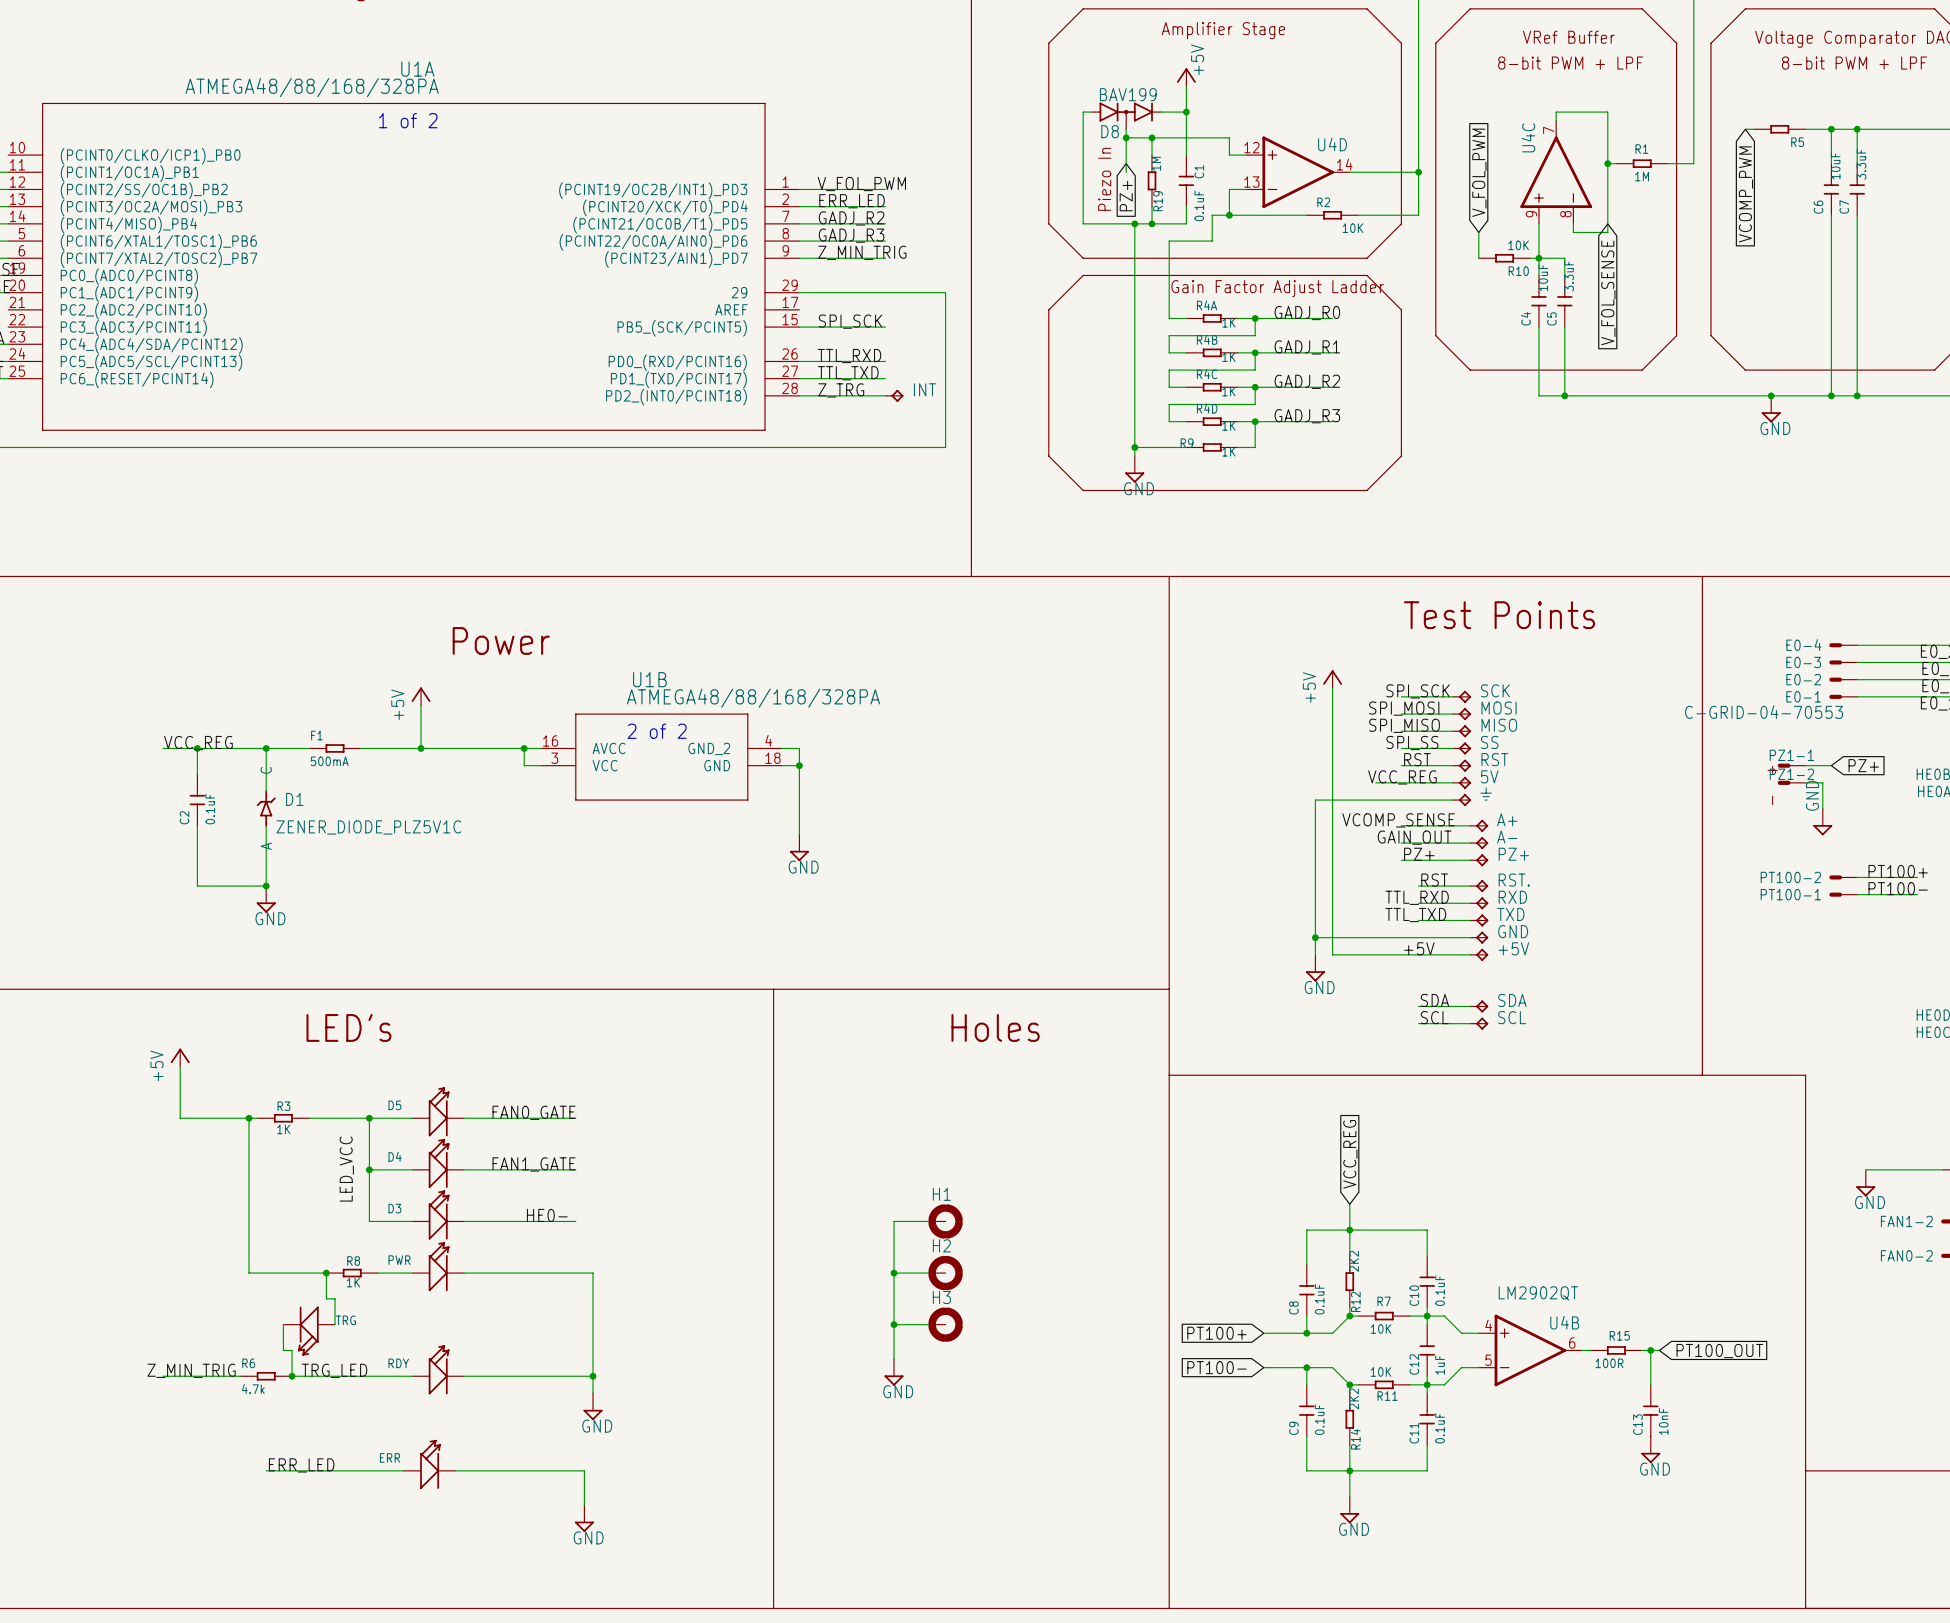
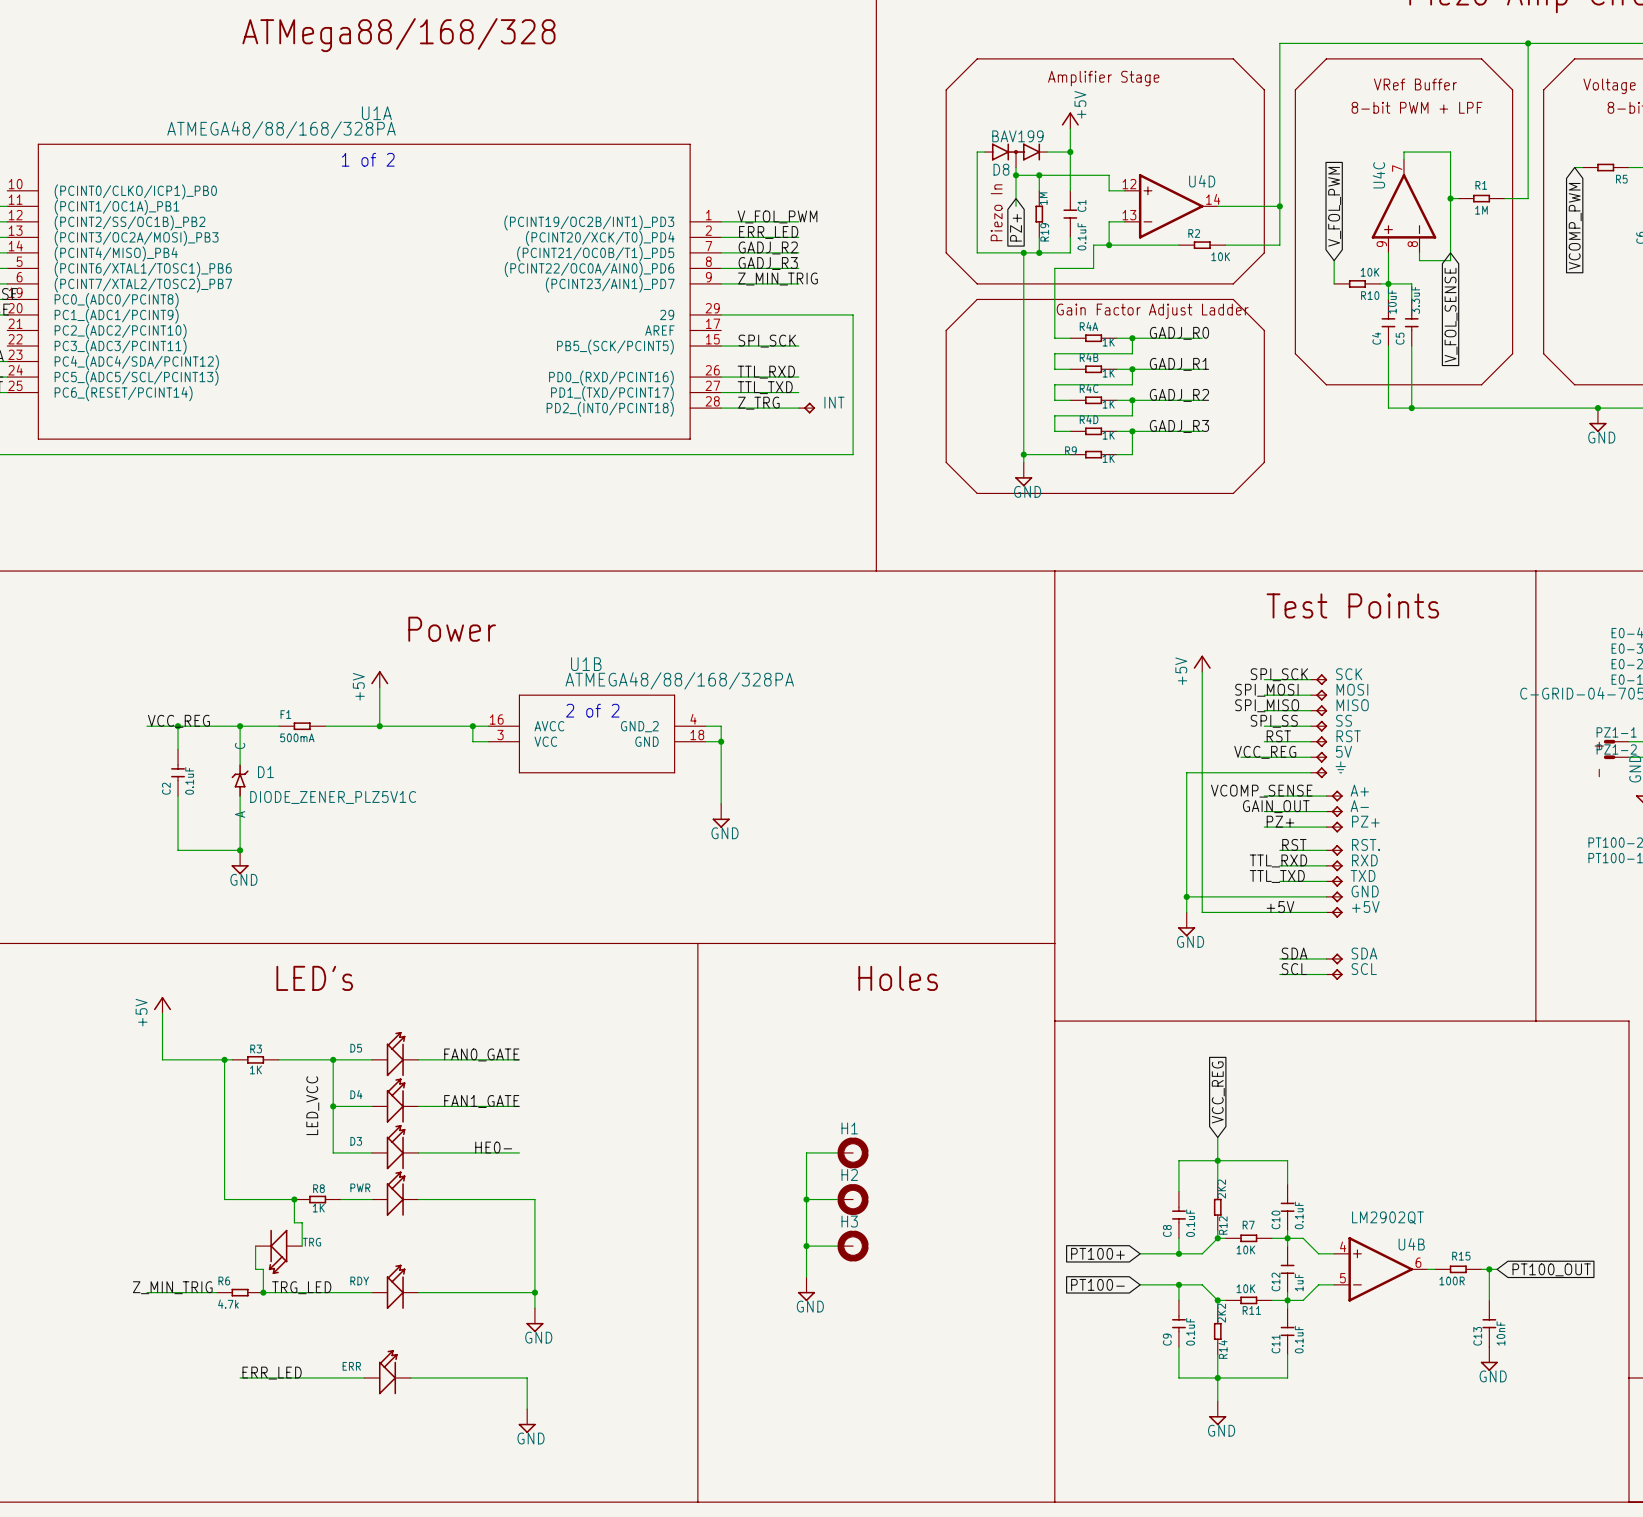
D1 value: ZENER_DIODE_PLZ5V1C (368, 827) -> DIODE_ZENER_PLZ5V1C (333, 797)

